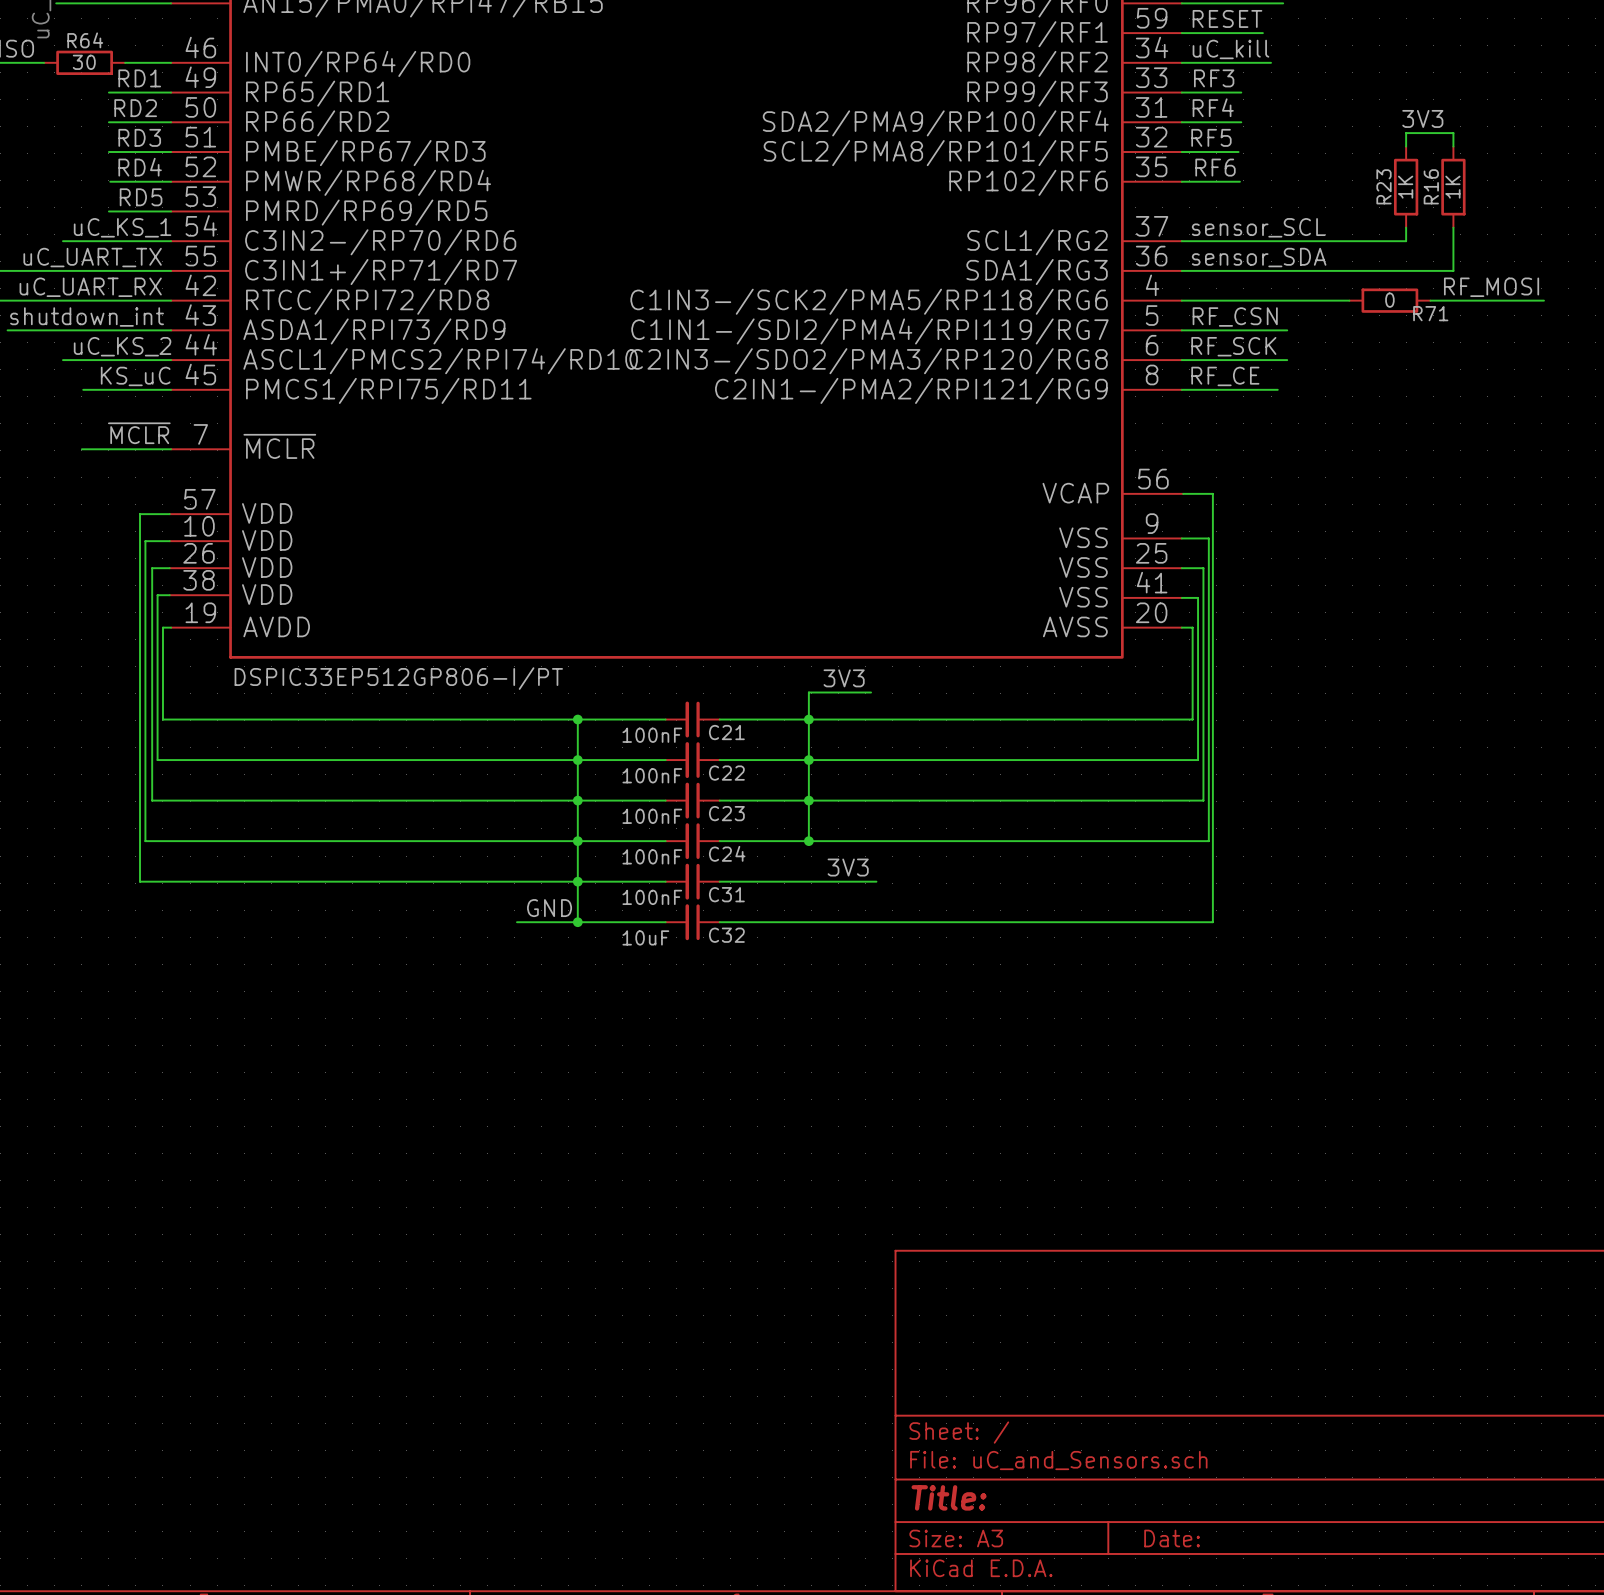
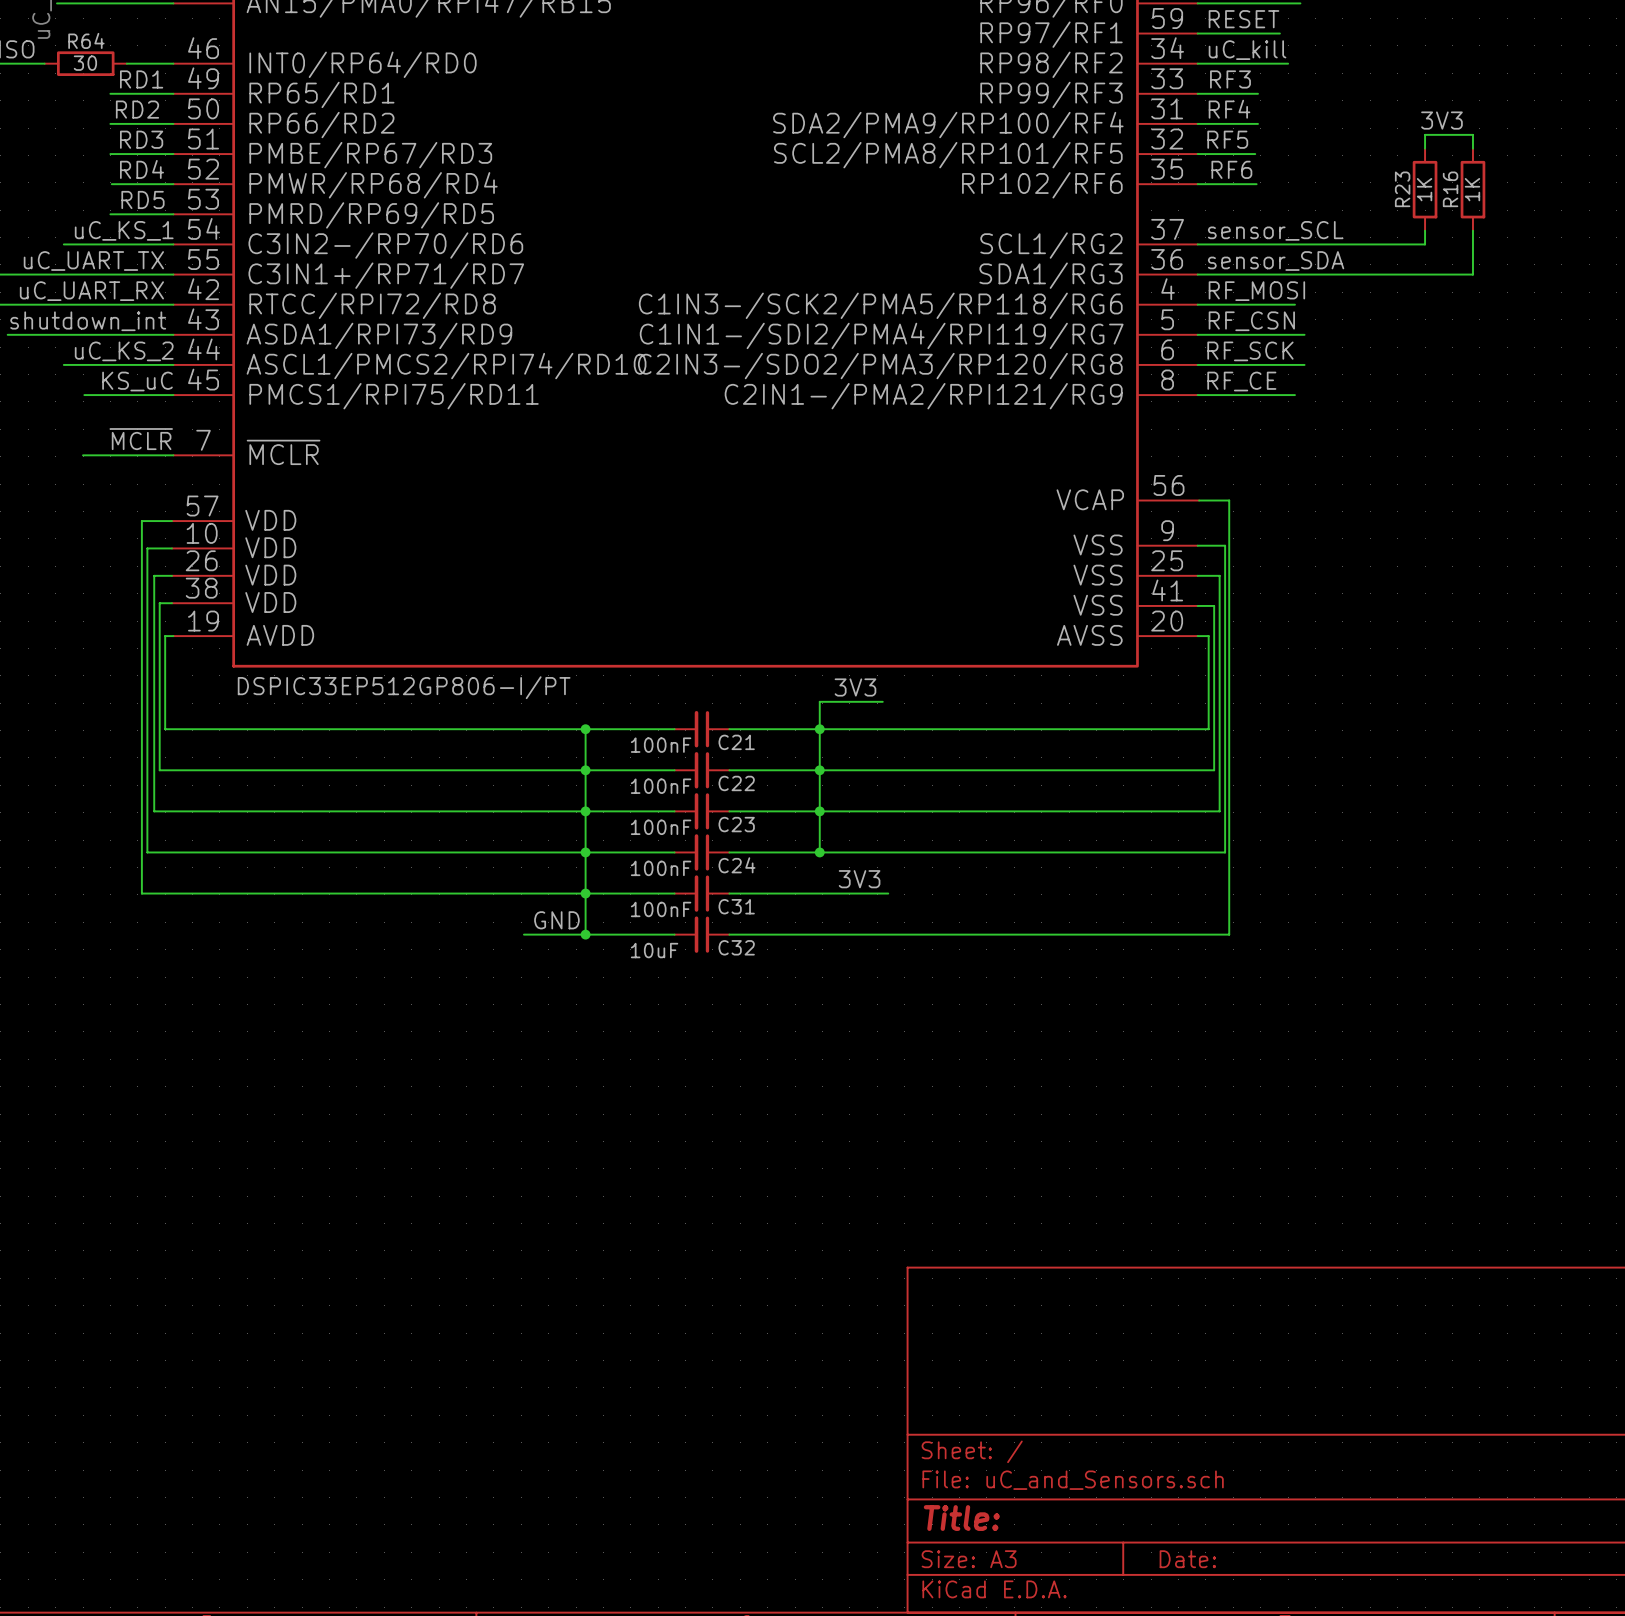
label position: RF_MOSI (1491, 287) -> RF_MOSI (1256, 291)
wire: (1277, 300) (1349, 300) -> none
R71: 0 (1389, 300) -> none
wire: (1430, 300) (1543, 300) -> none

